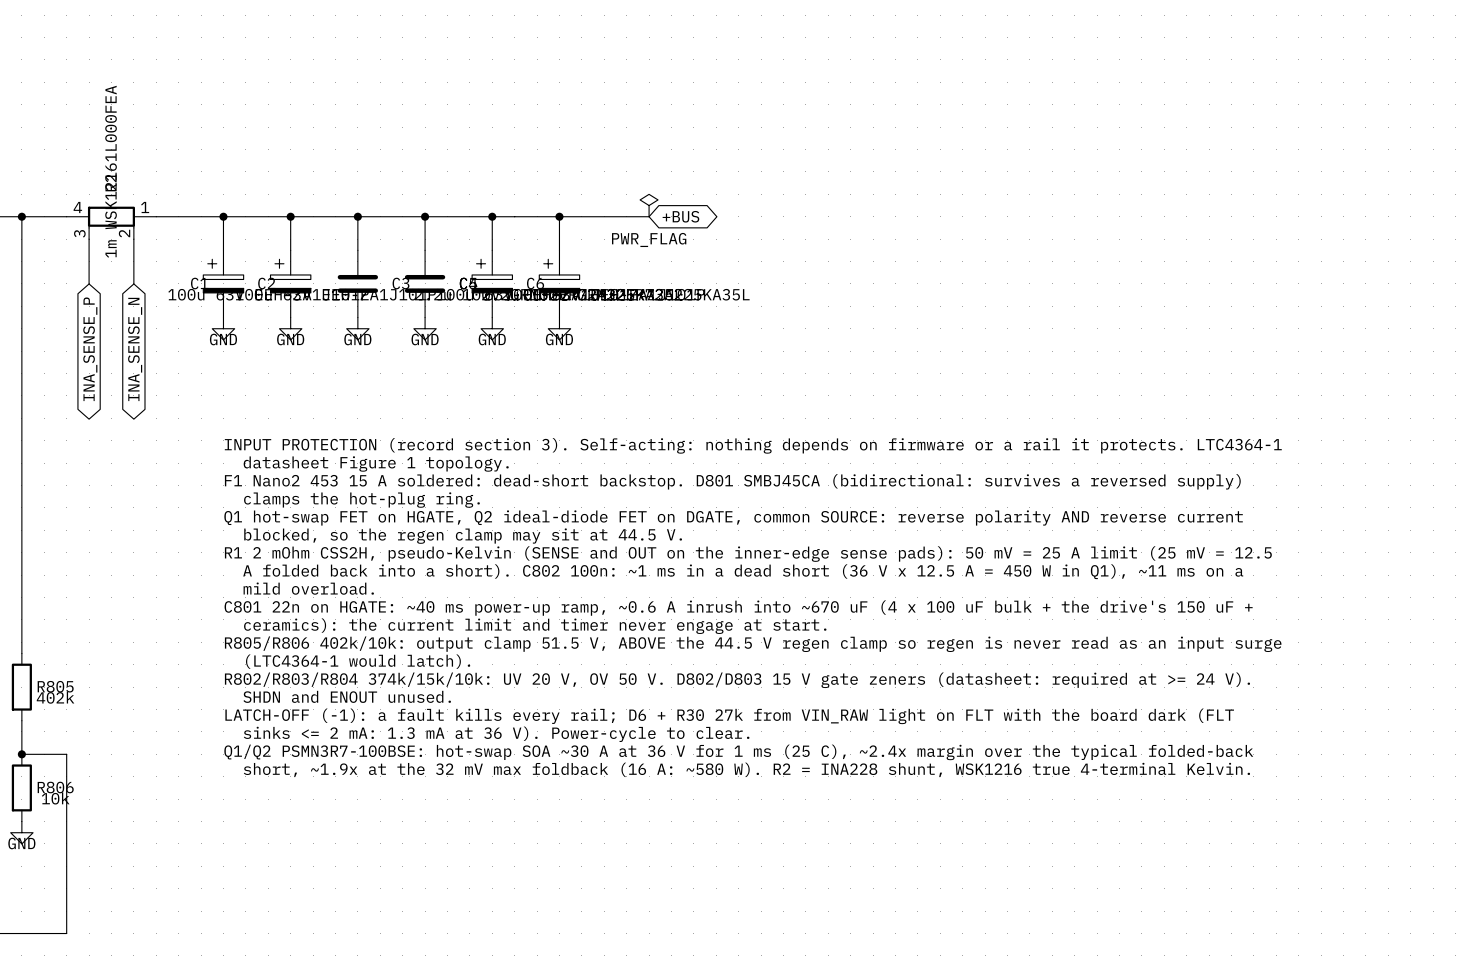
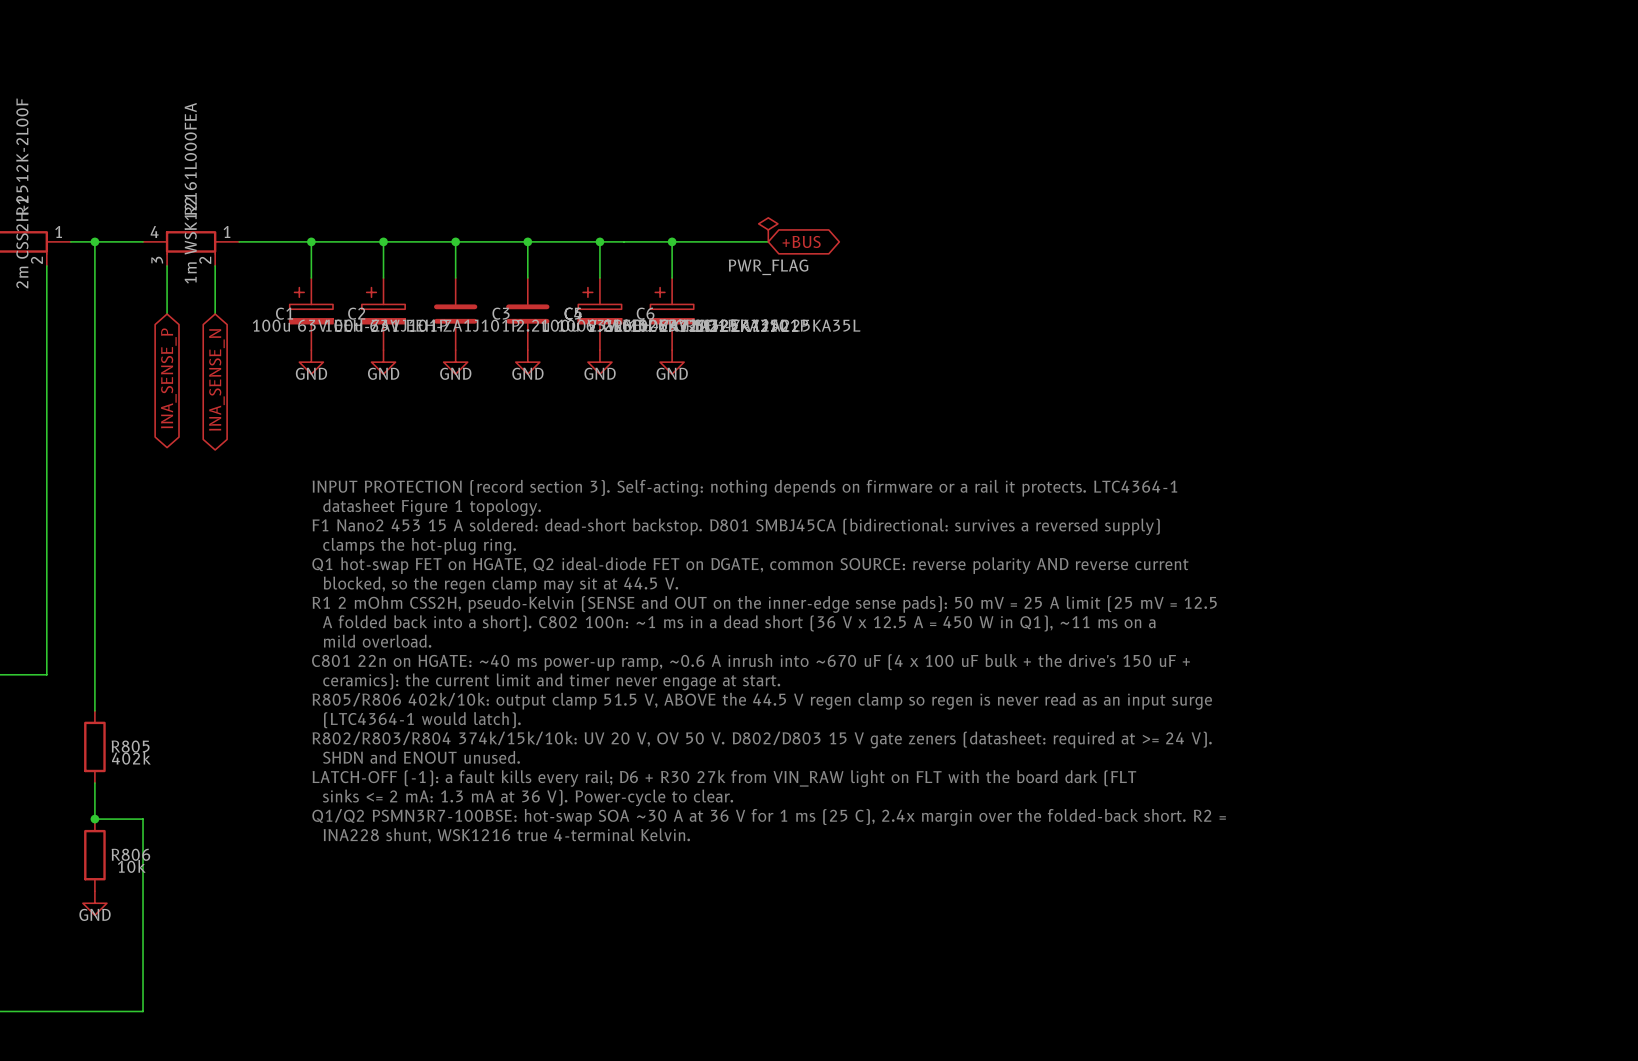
text: Q1/Q2 PSMN3R7-100BSE: hot-swap SOA ~30 A at 36 V for 1 ms (25 C), ~2.4x margin over the typical folded-back (738, 752) -> Q1/Q2 PSMN3R7-100BSE: hot-swap SOA ~30 A at 36 V for 1 ms (25 C), 2.4x margin over the folded-back short. R2 = (769, 817)
text: short, ~1.9x at the 32 mV max foldback (16 A: ~580 W). R2 = INA228 shunt, WSK1216 true 4-terminal Kelvin. (746, 769) -> INA228 shunt, WSK1216 true 4-terminal Kelvin. (506, 835)

